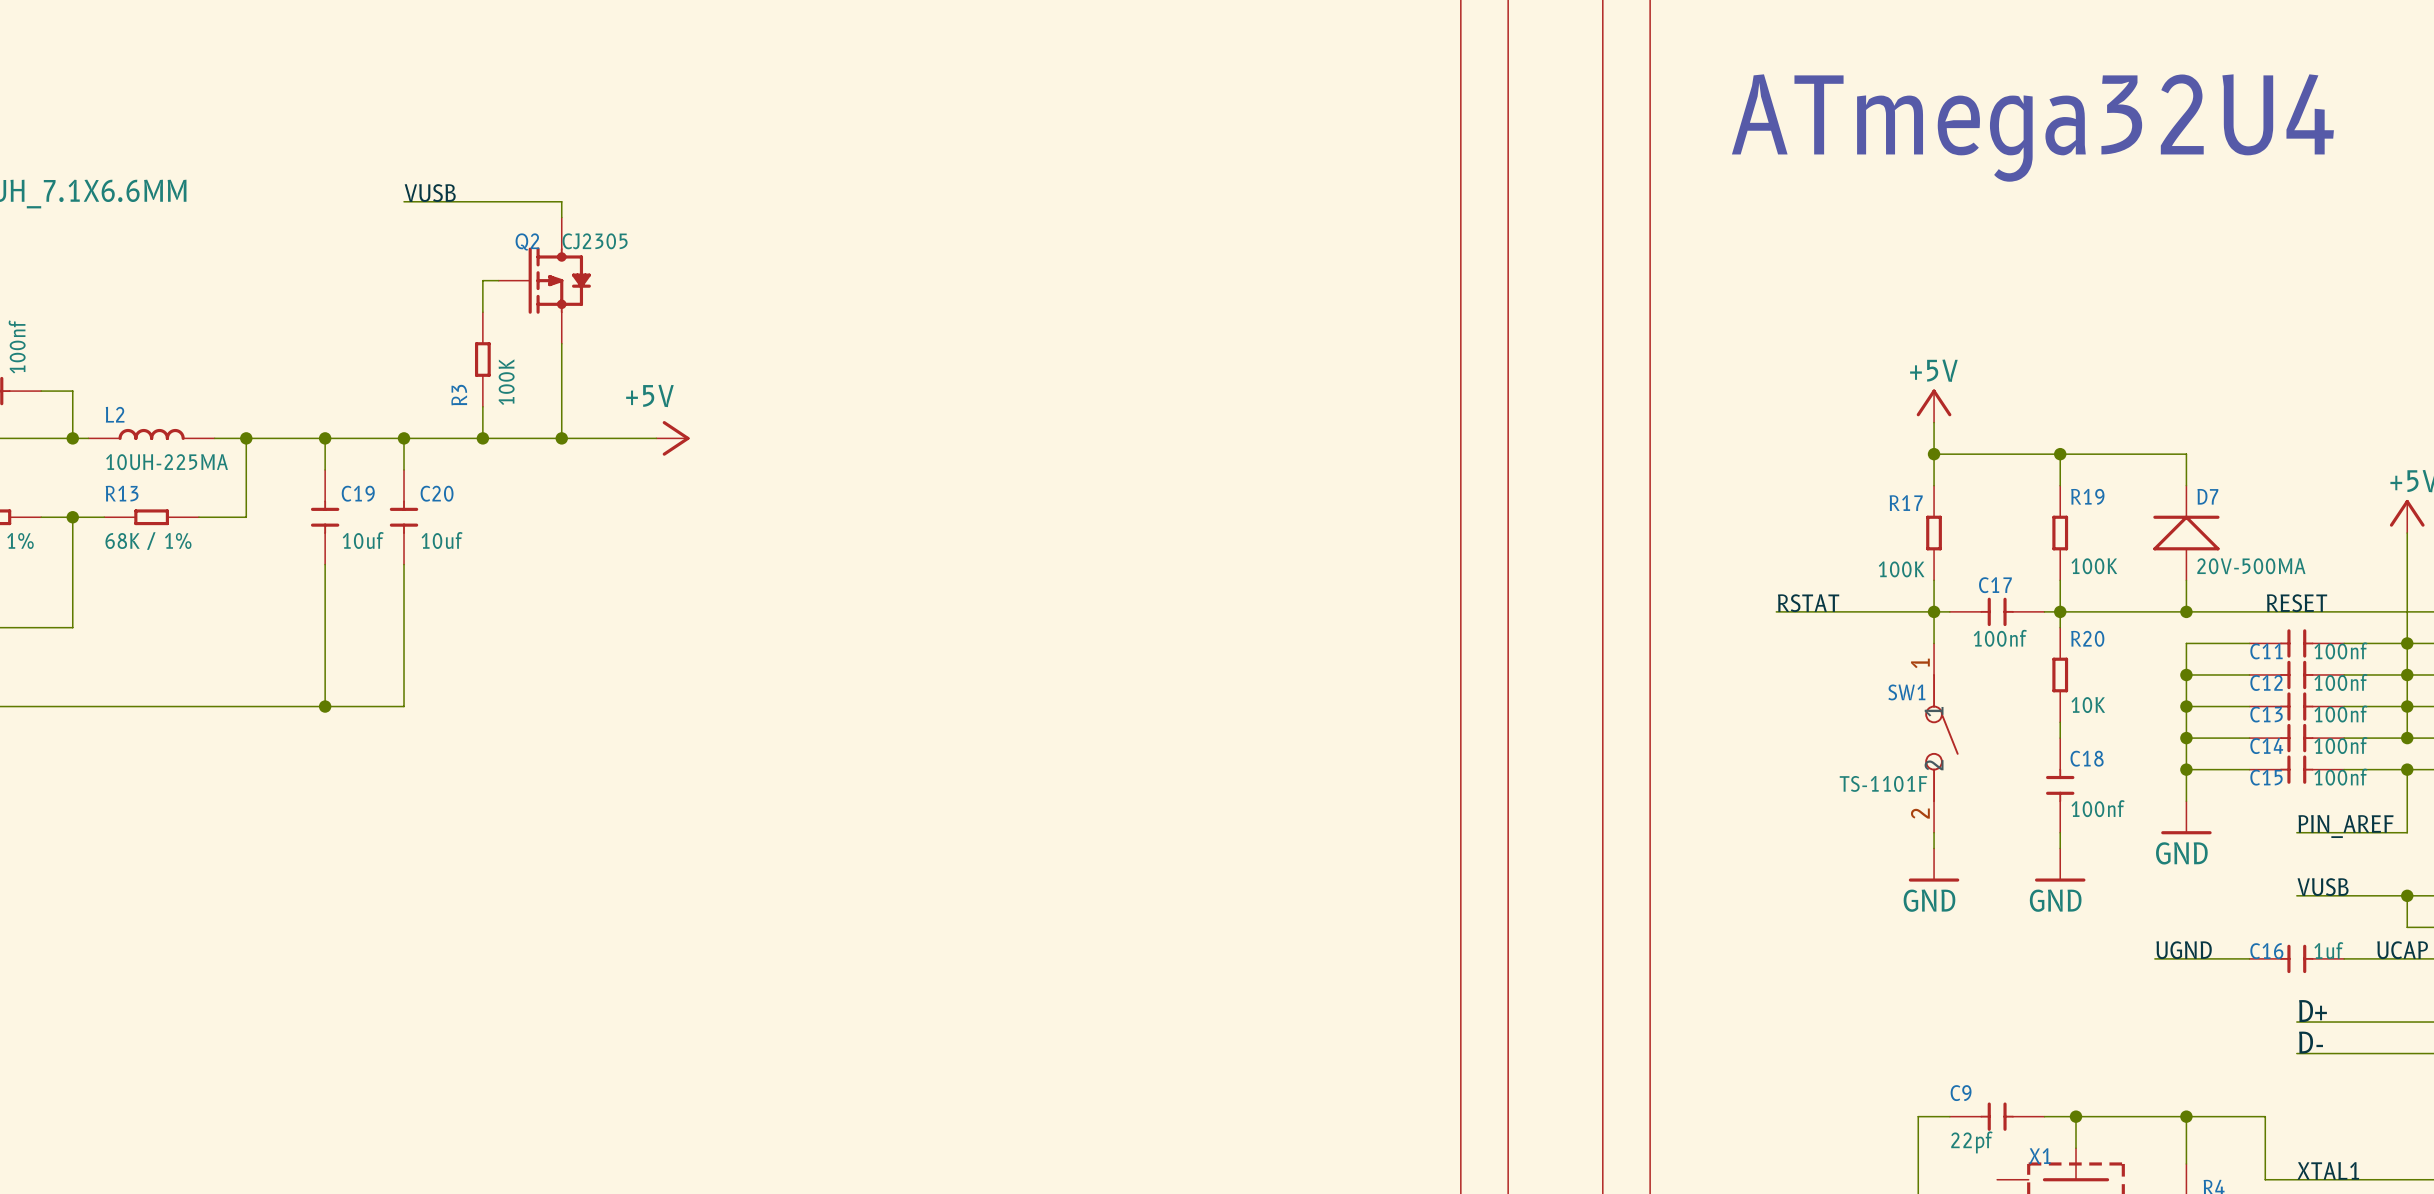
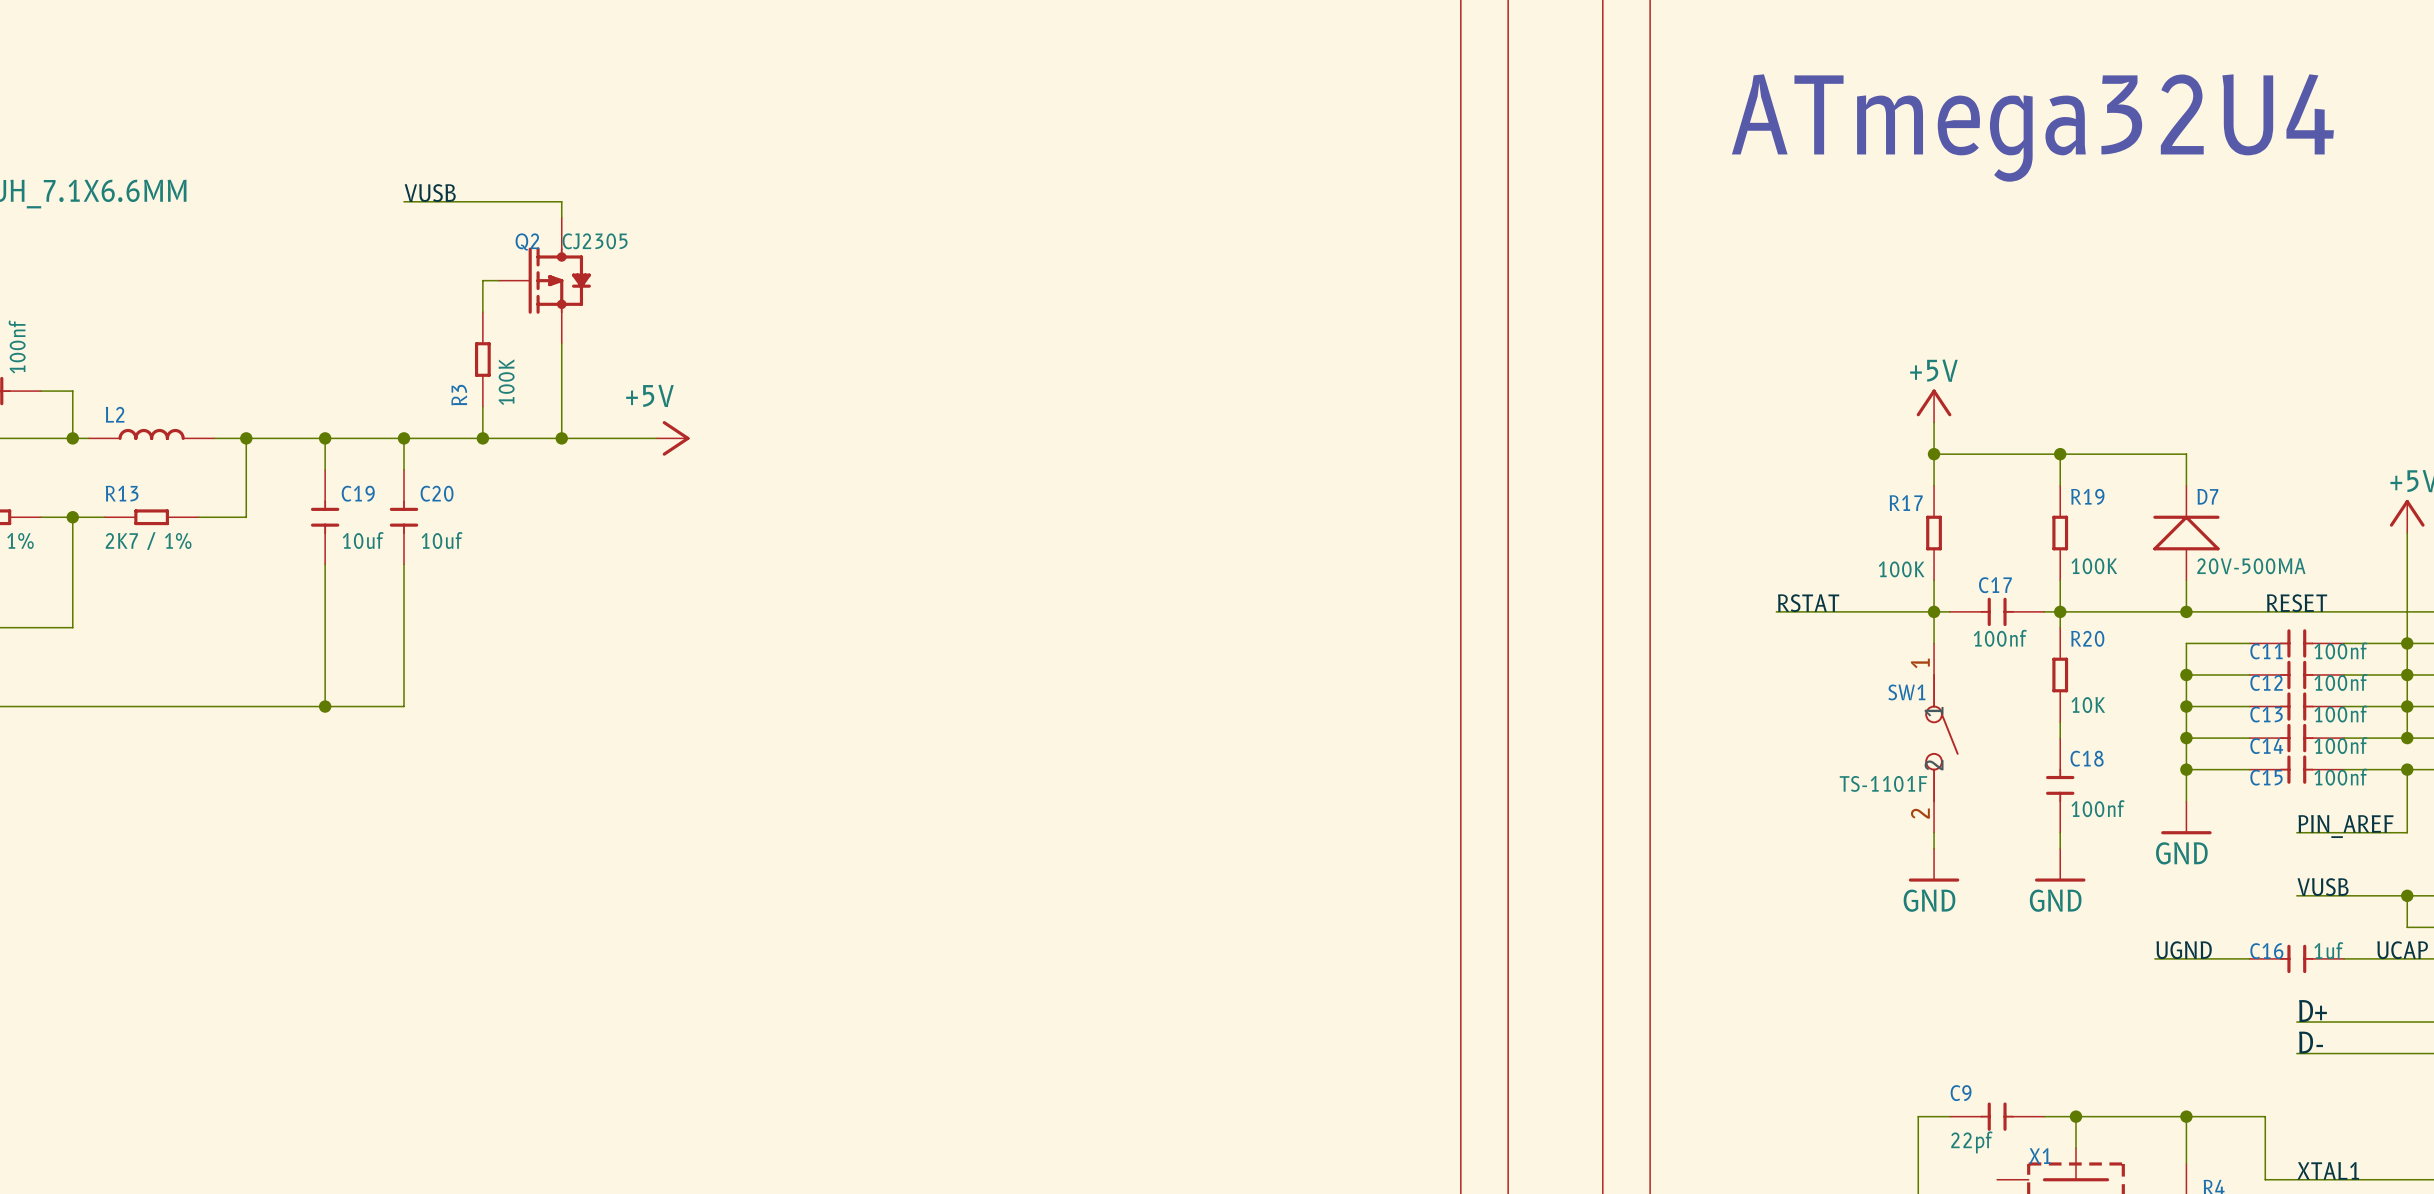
L2 value: 10UH-225MA (167, 462) -> none
R13 text: none -> 2K7 / 1% (148, 541)
R13 value: 68K / 1% (148, 541) -> none

